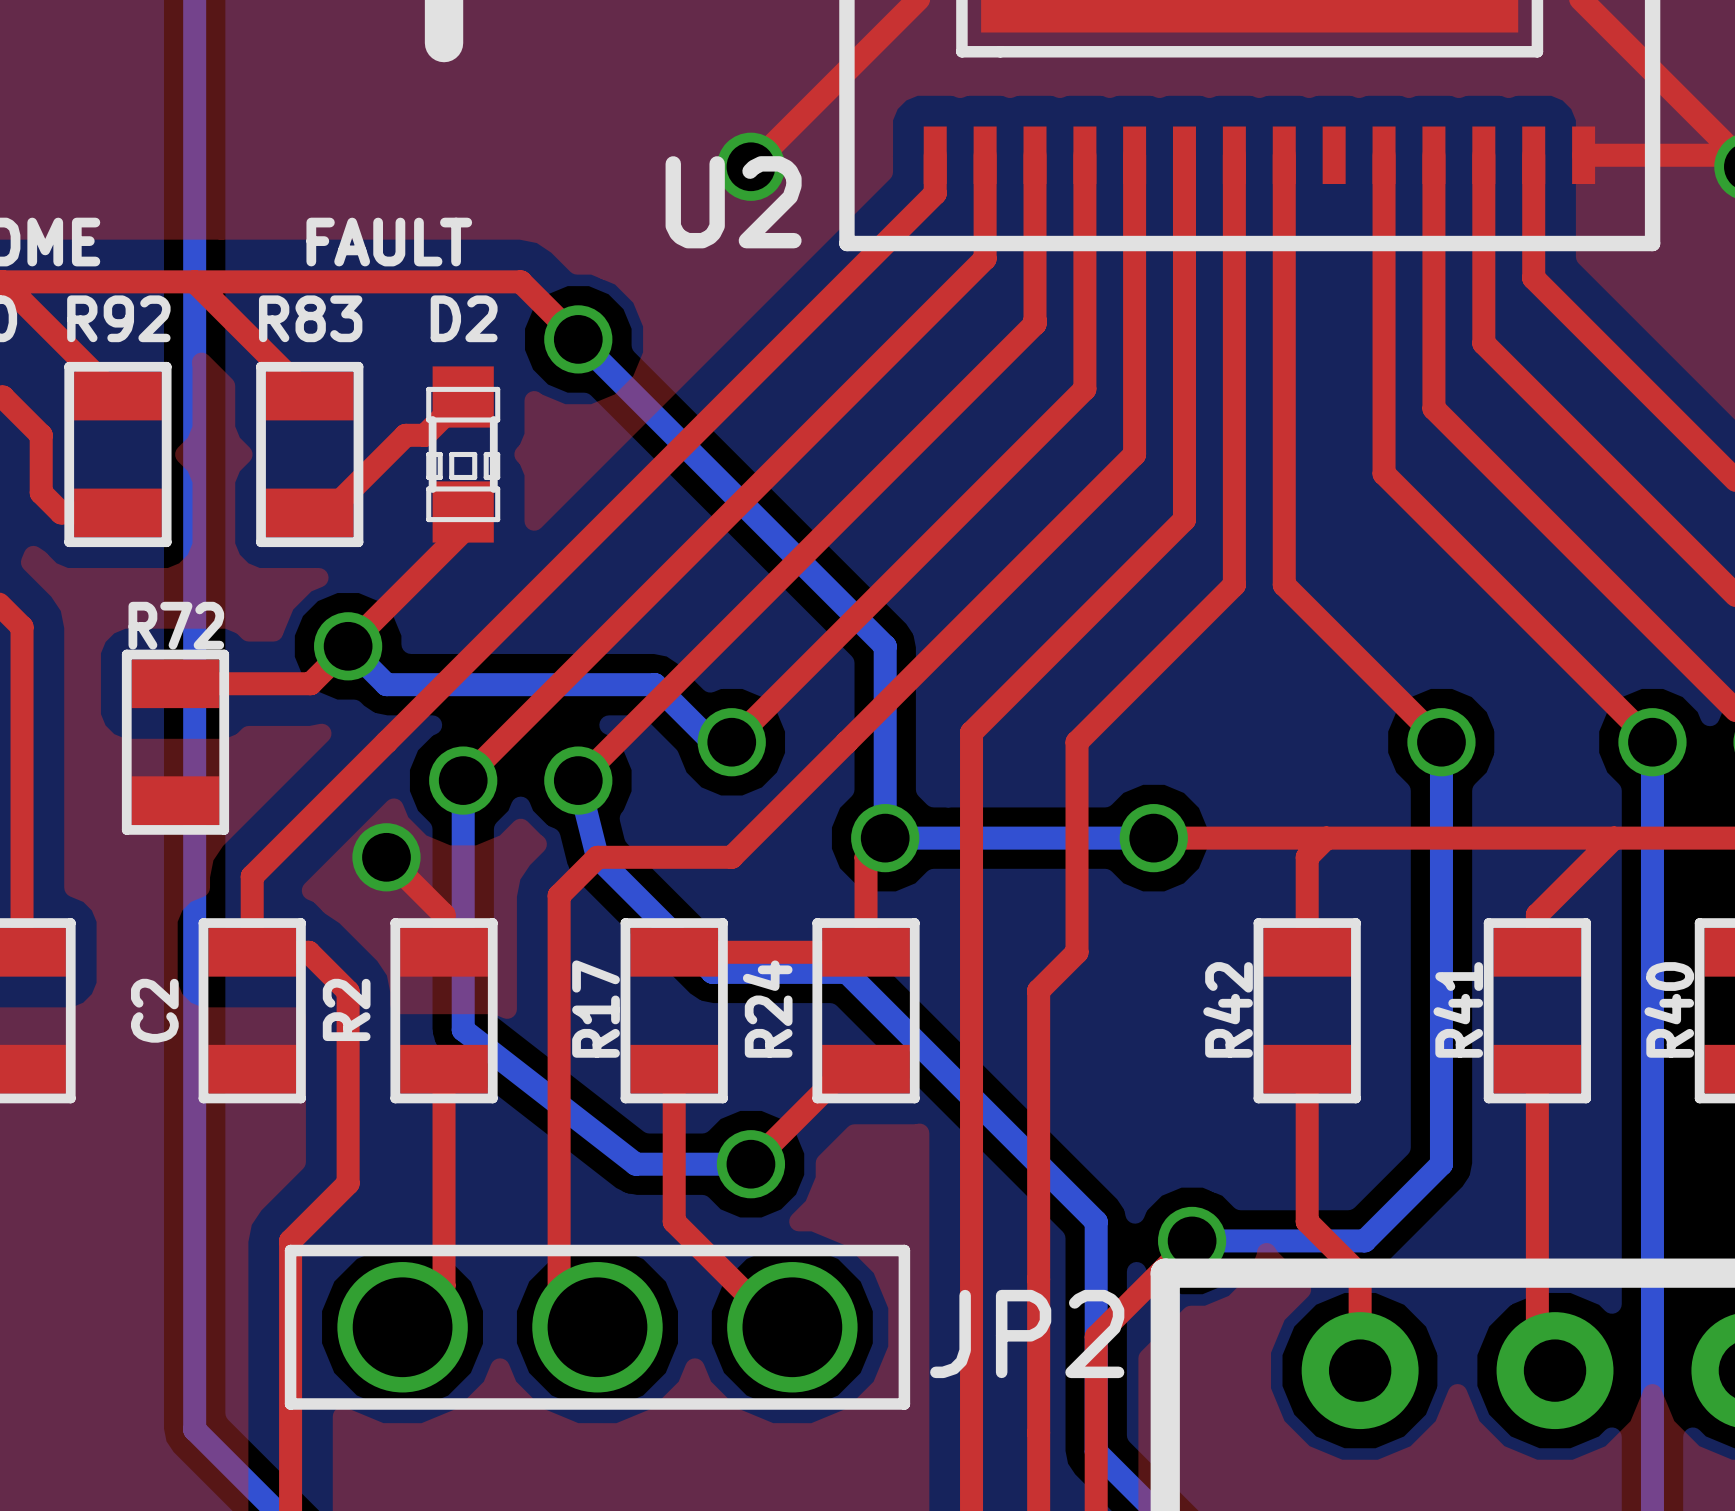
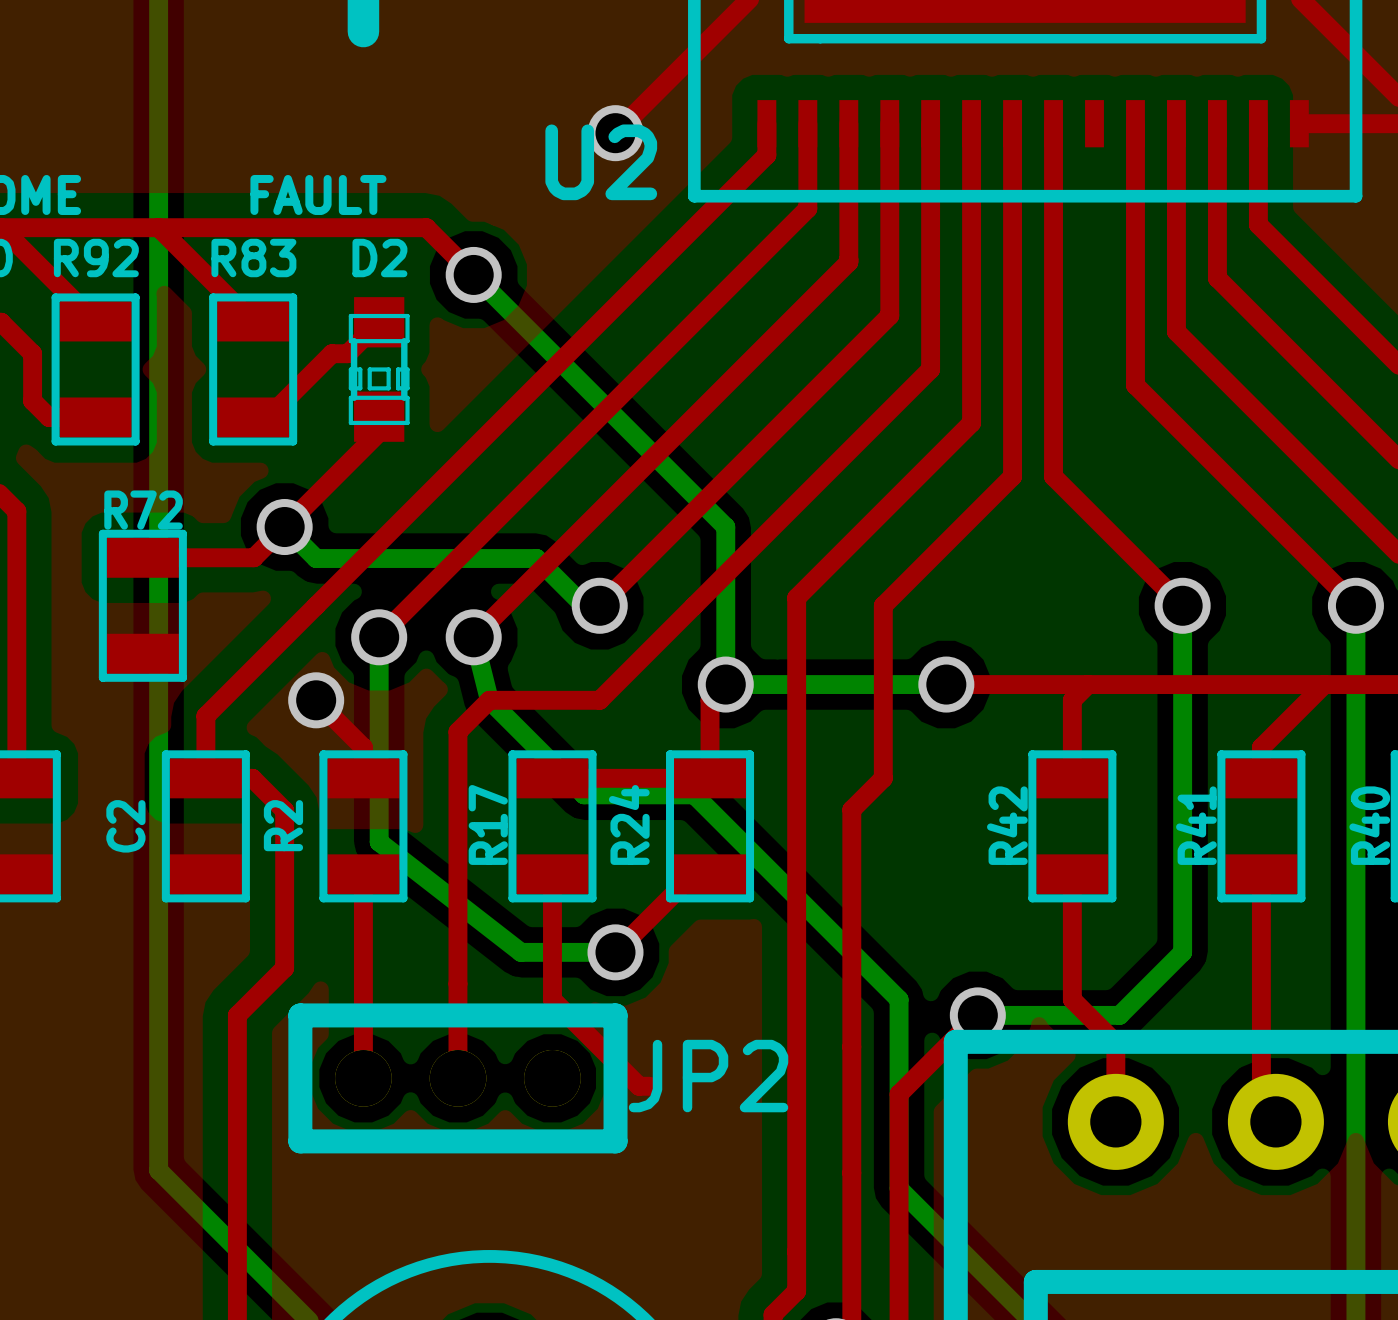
JP2 footprint: [284, 1244, 911, 1410] -> [288, 1003, 628, 1154]

